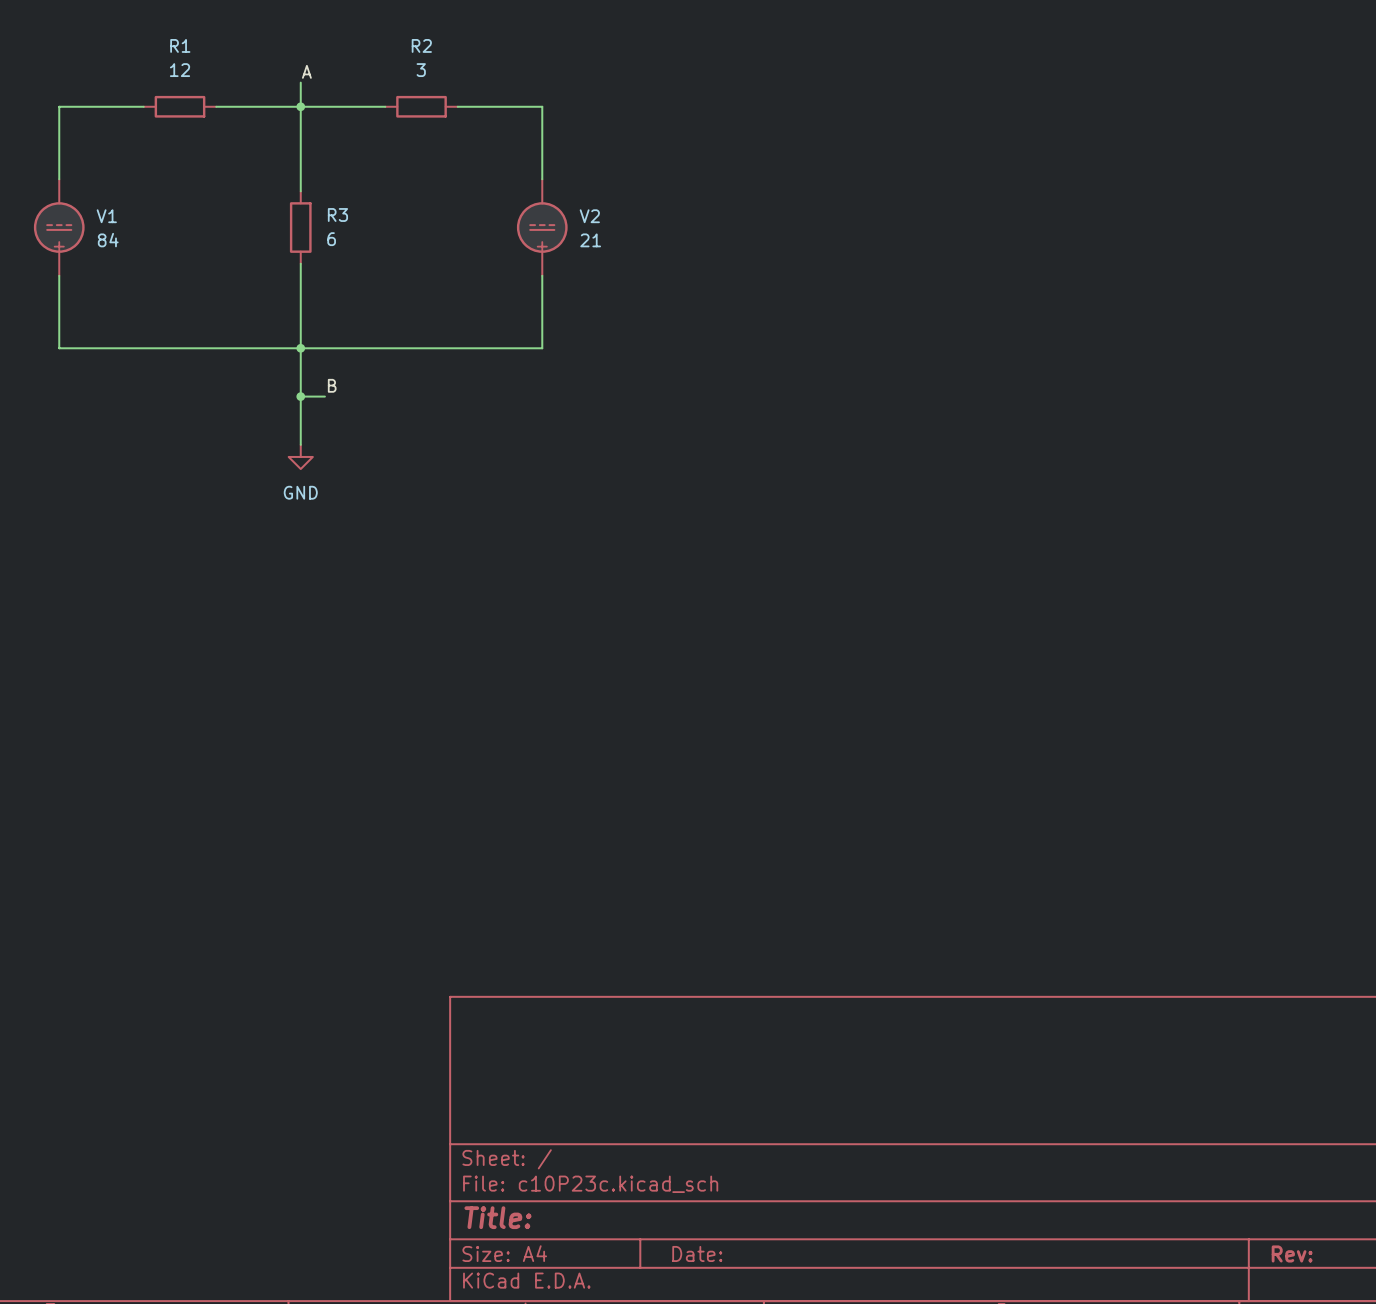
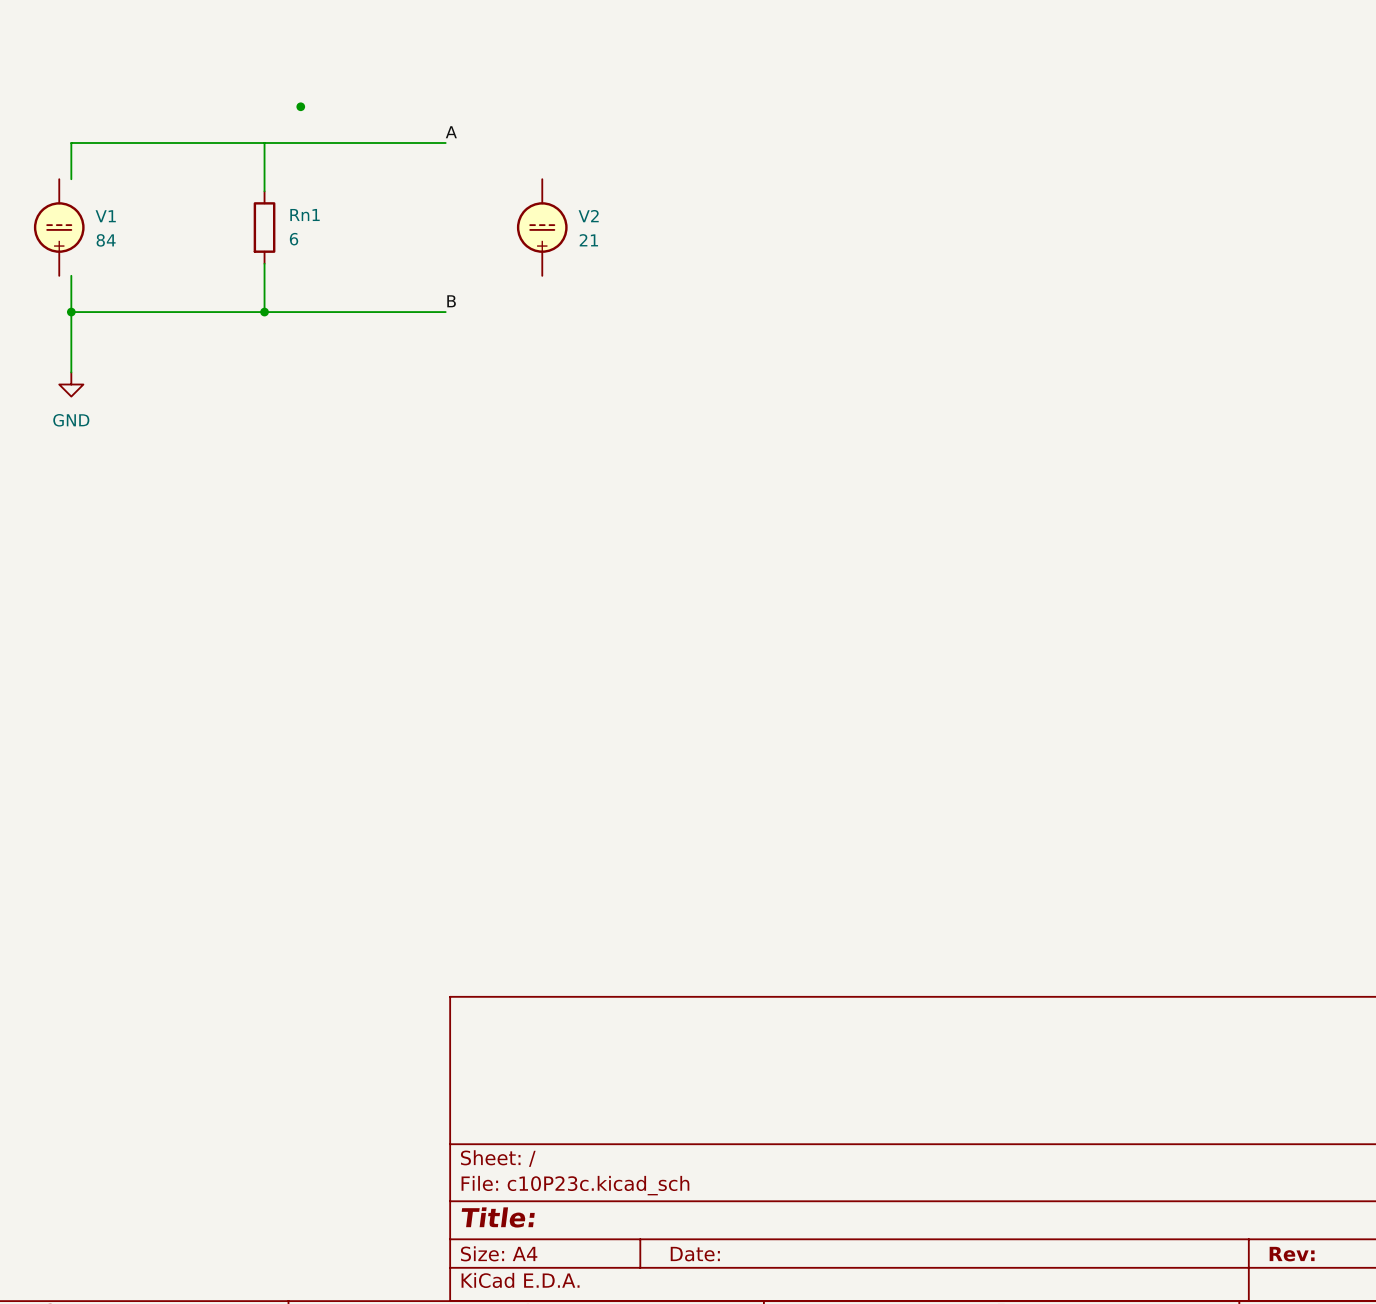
label position: A (306, 71) -> A (451, 132)
wire: (300, 82) (300, 191) -> none
wire: (143, 106) (59, 106) (59, 179) -> none
R1: 12 (180, 106) -> none
wire: (216, 106) (385, 106) -> none
R2: 3 (421, 106) -> none
wire: (457, 106) (542, 106) (542, 179) -> none
wire: none -> (264, 143) (264, 191)
wire: none -> (445, 143) (71, 143) (71, 179)
Rn1: none -> 6 (264, 227)
R3: 6 (300, 227) -> none
wire: none -> (264, 263) (264, 312)
wire: (300, 263) (300, 444) -> none
wire: (59, 275) (59, 348) (542, 348) (542, 275) -> none
wire: none -> (71, 275) (71, 372)
wire: none -> (71, 312) (445, 312)
junction: none -> (71, 312)
junction: none -> (264, 312)
junction: (300, 348) -> none
power symbol: none -> GND (71, 384)
label position: B (332, 385) -> B (451, 301)
wire: (300, 396) (324, 396) -> none
junction: (300, 396) -> none
power symbol: GND (300, 456) -> none

